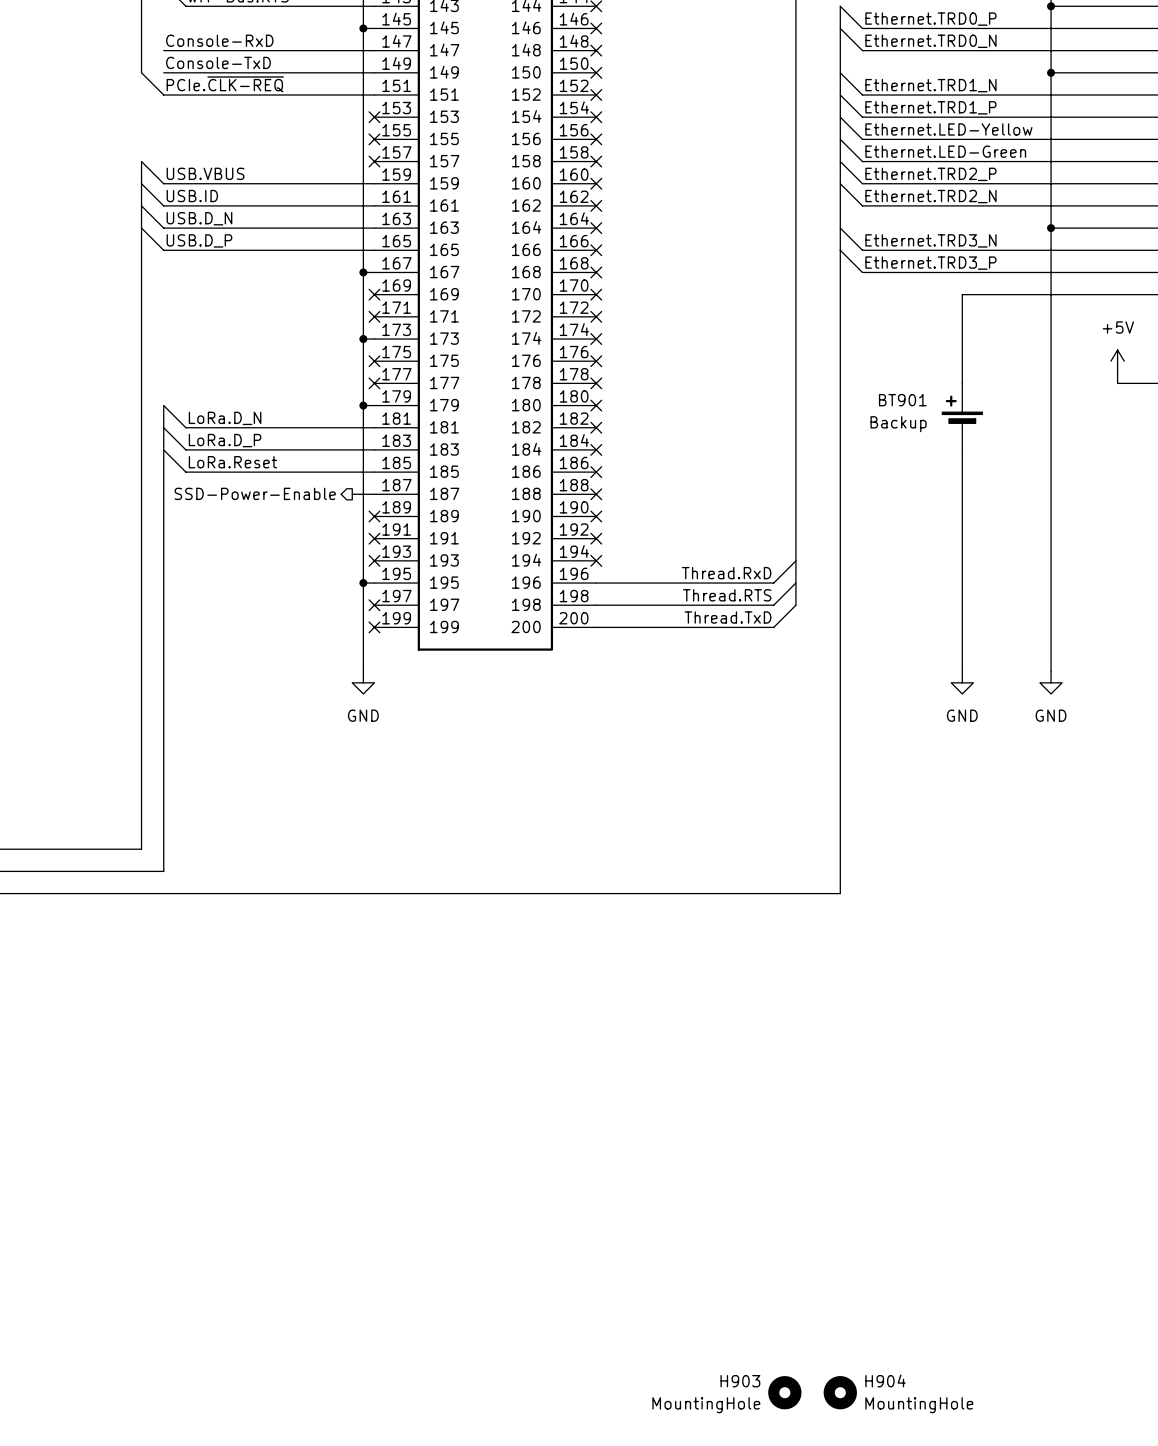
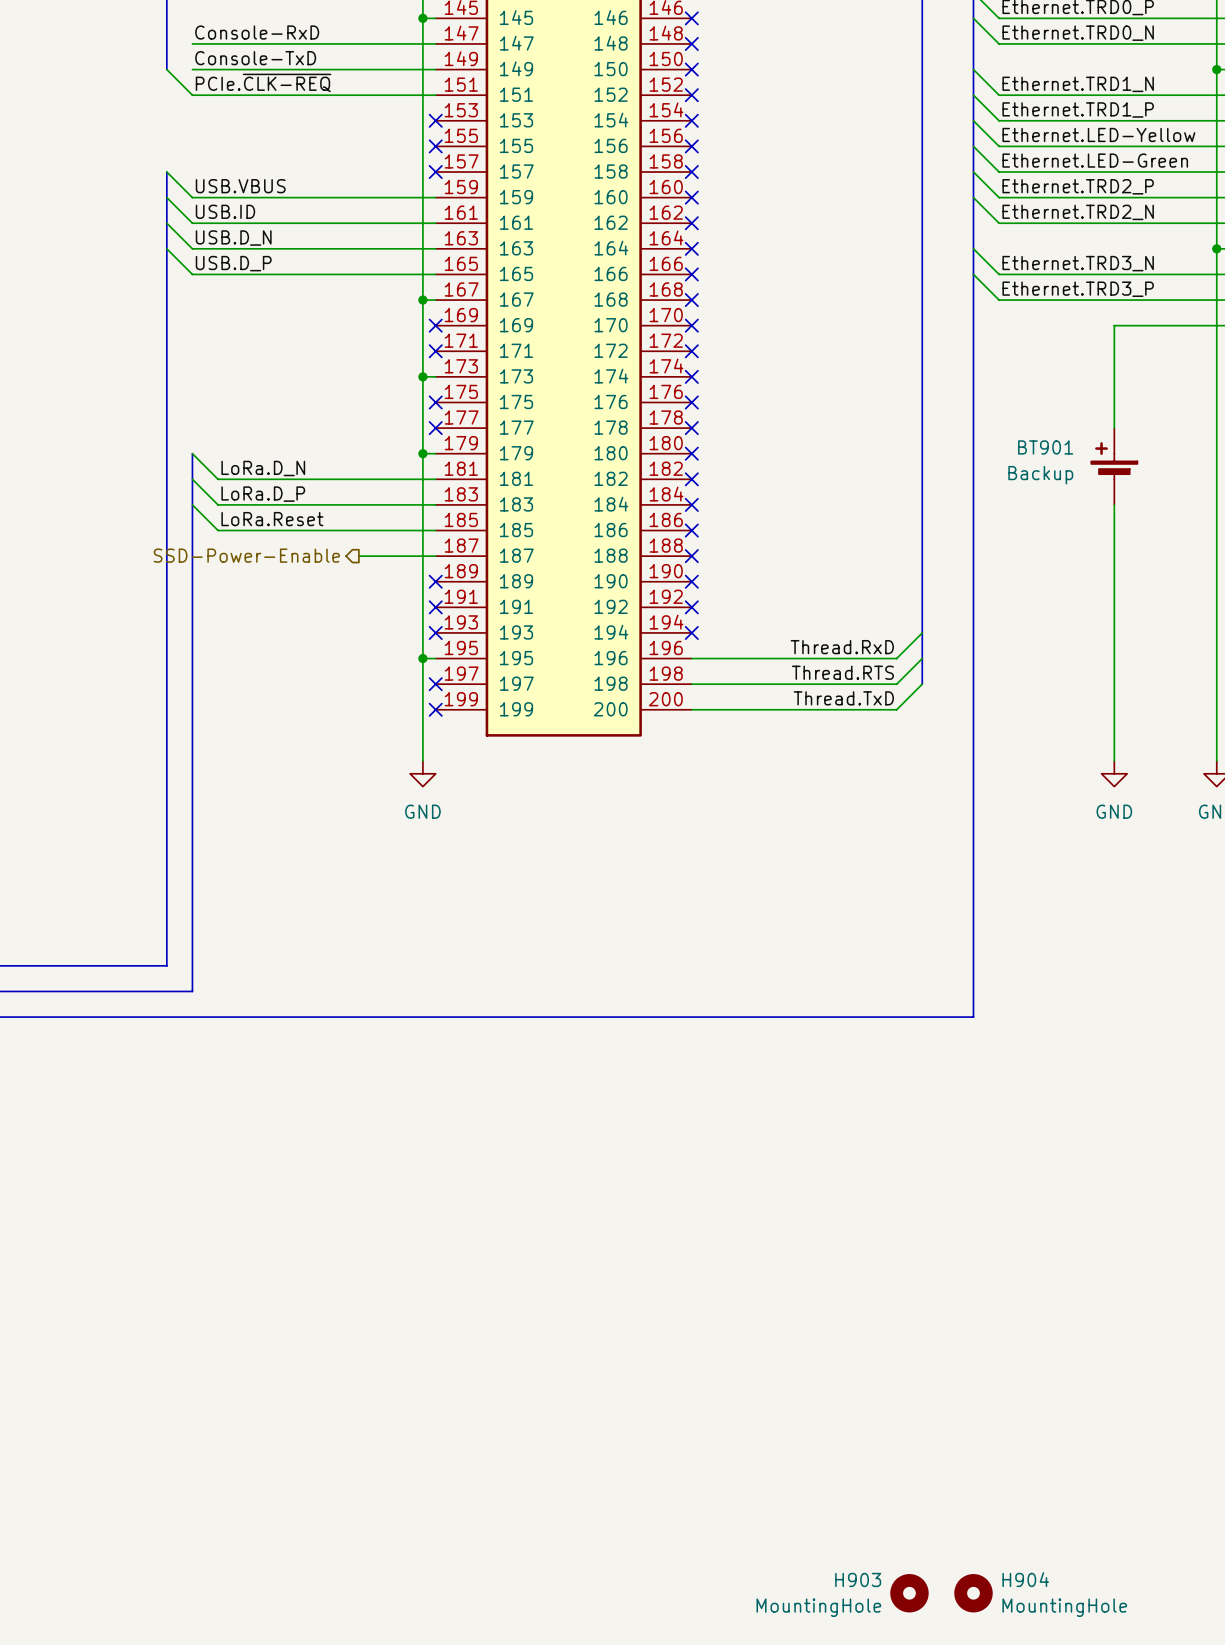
hierarchical label position: SSD-Power-Enable (255, 493) -> SSD-Power-Enable (246, 555)
wire: none -> (358, 556) (410, 556)

